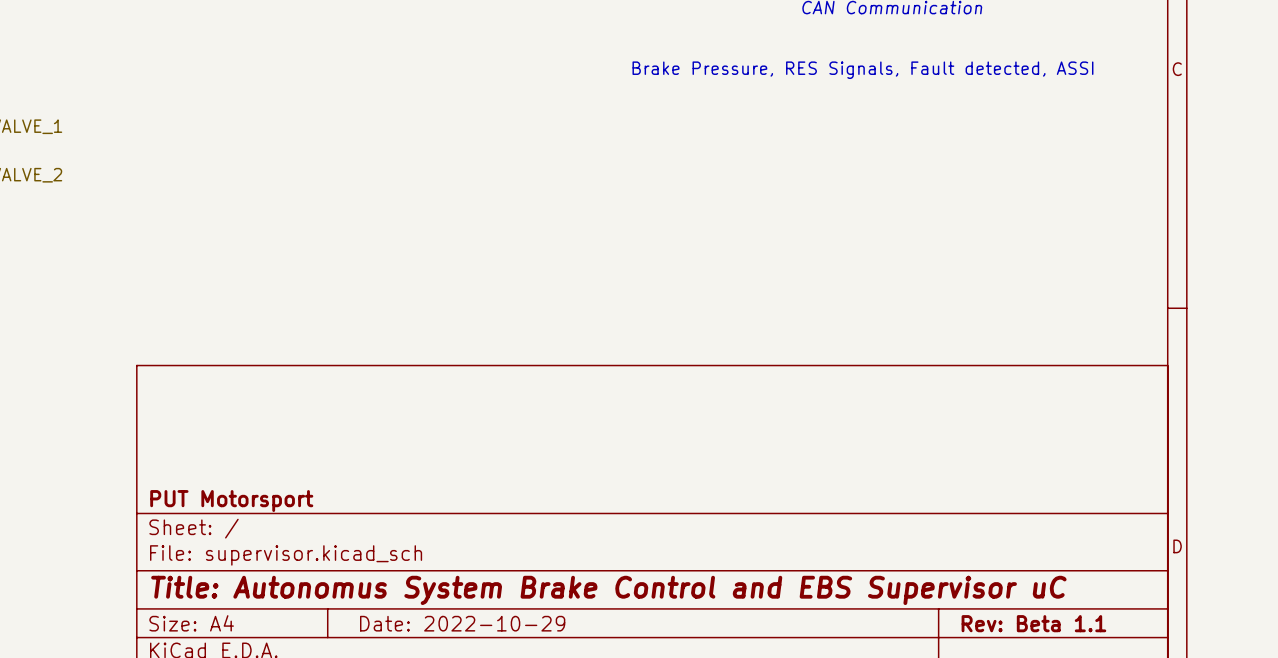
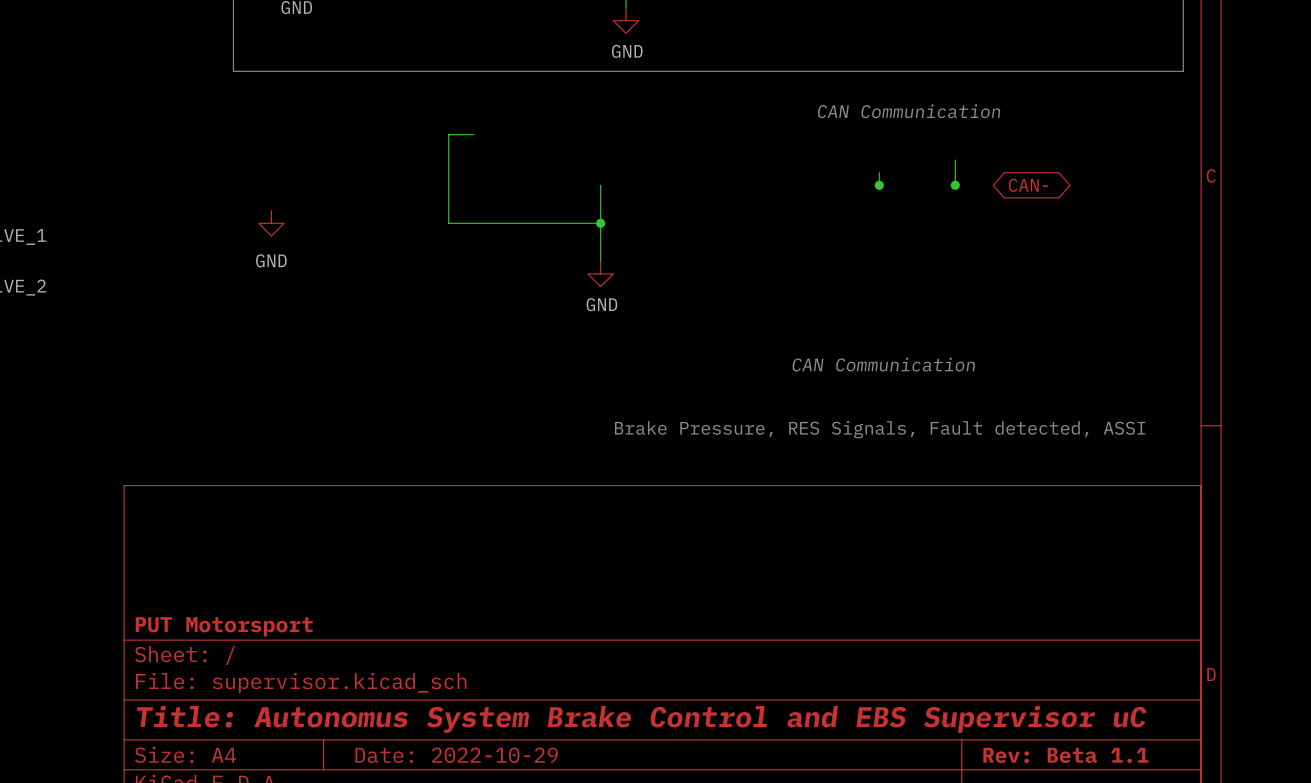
wire: none -> (474, 134) (448, 134) (448, 223) (600, 223)
wire: none -> (955, 159) (955, 185)
wire: none -> (879, 172) (879, 185)
text: Brake Pressure, RES Signals, Fault detected, ASSI (862, 70) -> none
wire: none -> (600, 185) (600, 261)
junction: none -> (879, 185)
junction: none -> (955, 185)
global label: none -> CAN- (1028, 185)
power symbol: none -> GND (271, 223)
junction: none -> (600, 223)
power symbol: none -> GND (600, 273)
text: none -> CAN Communication (883, 364)
text: none -> Brake Pressure, RES Signals, Fault detected, ASSI (880, 429)

